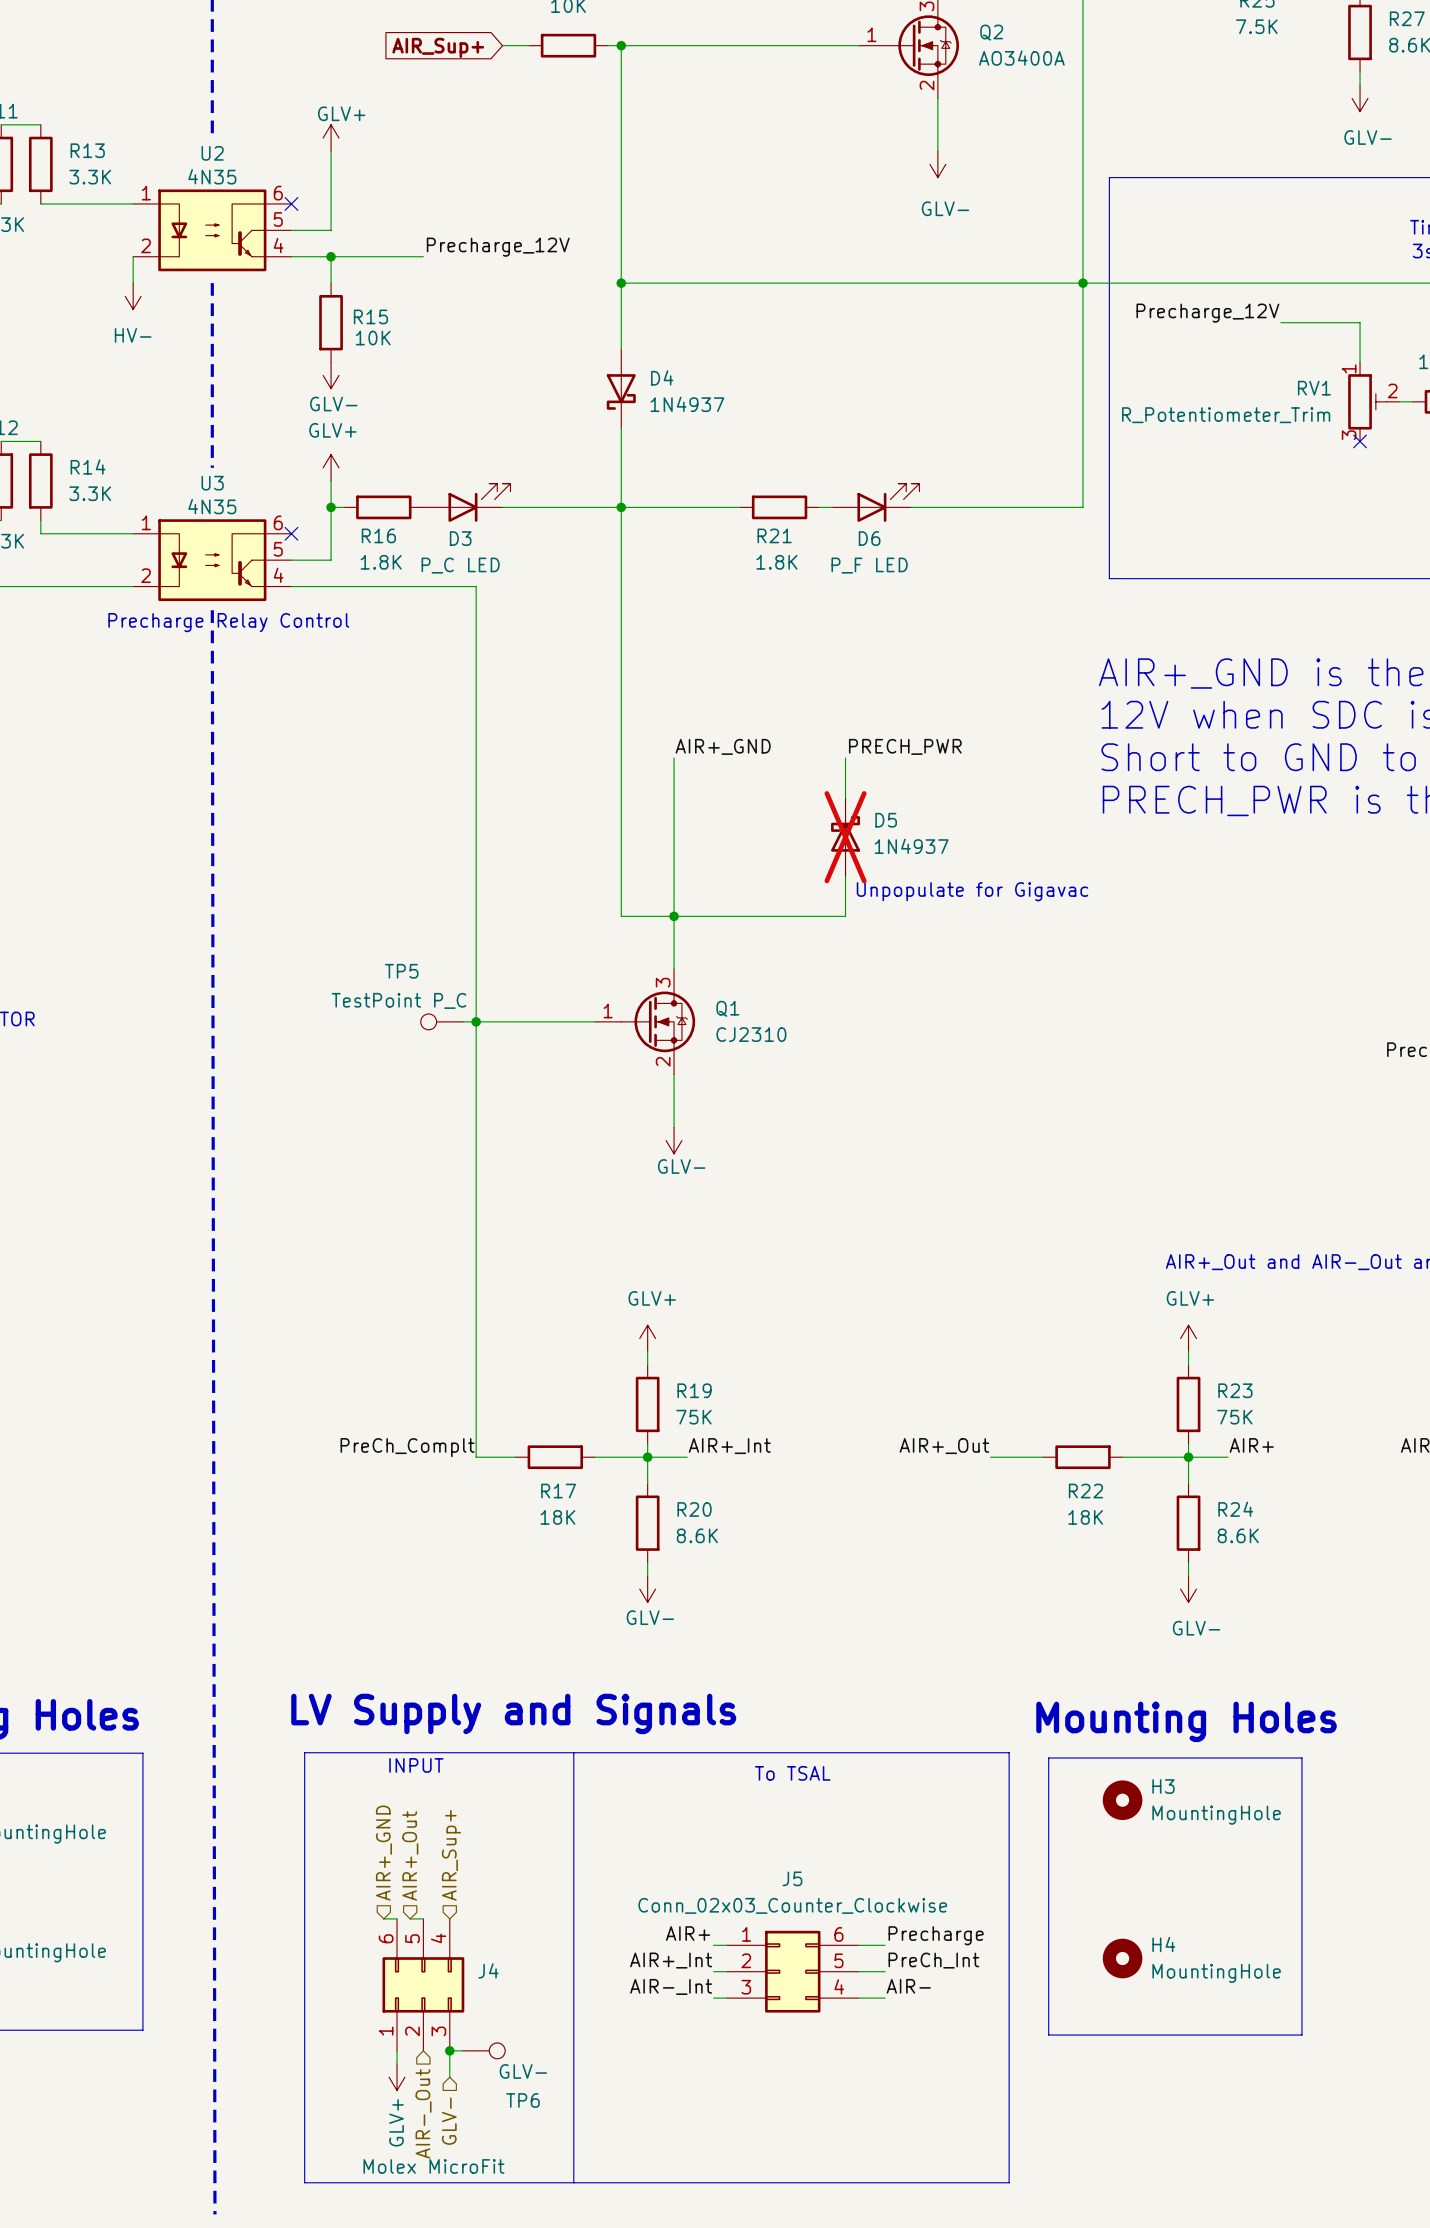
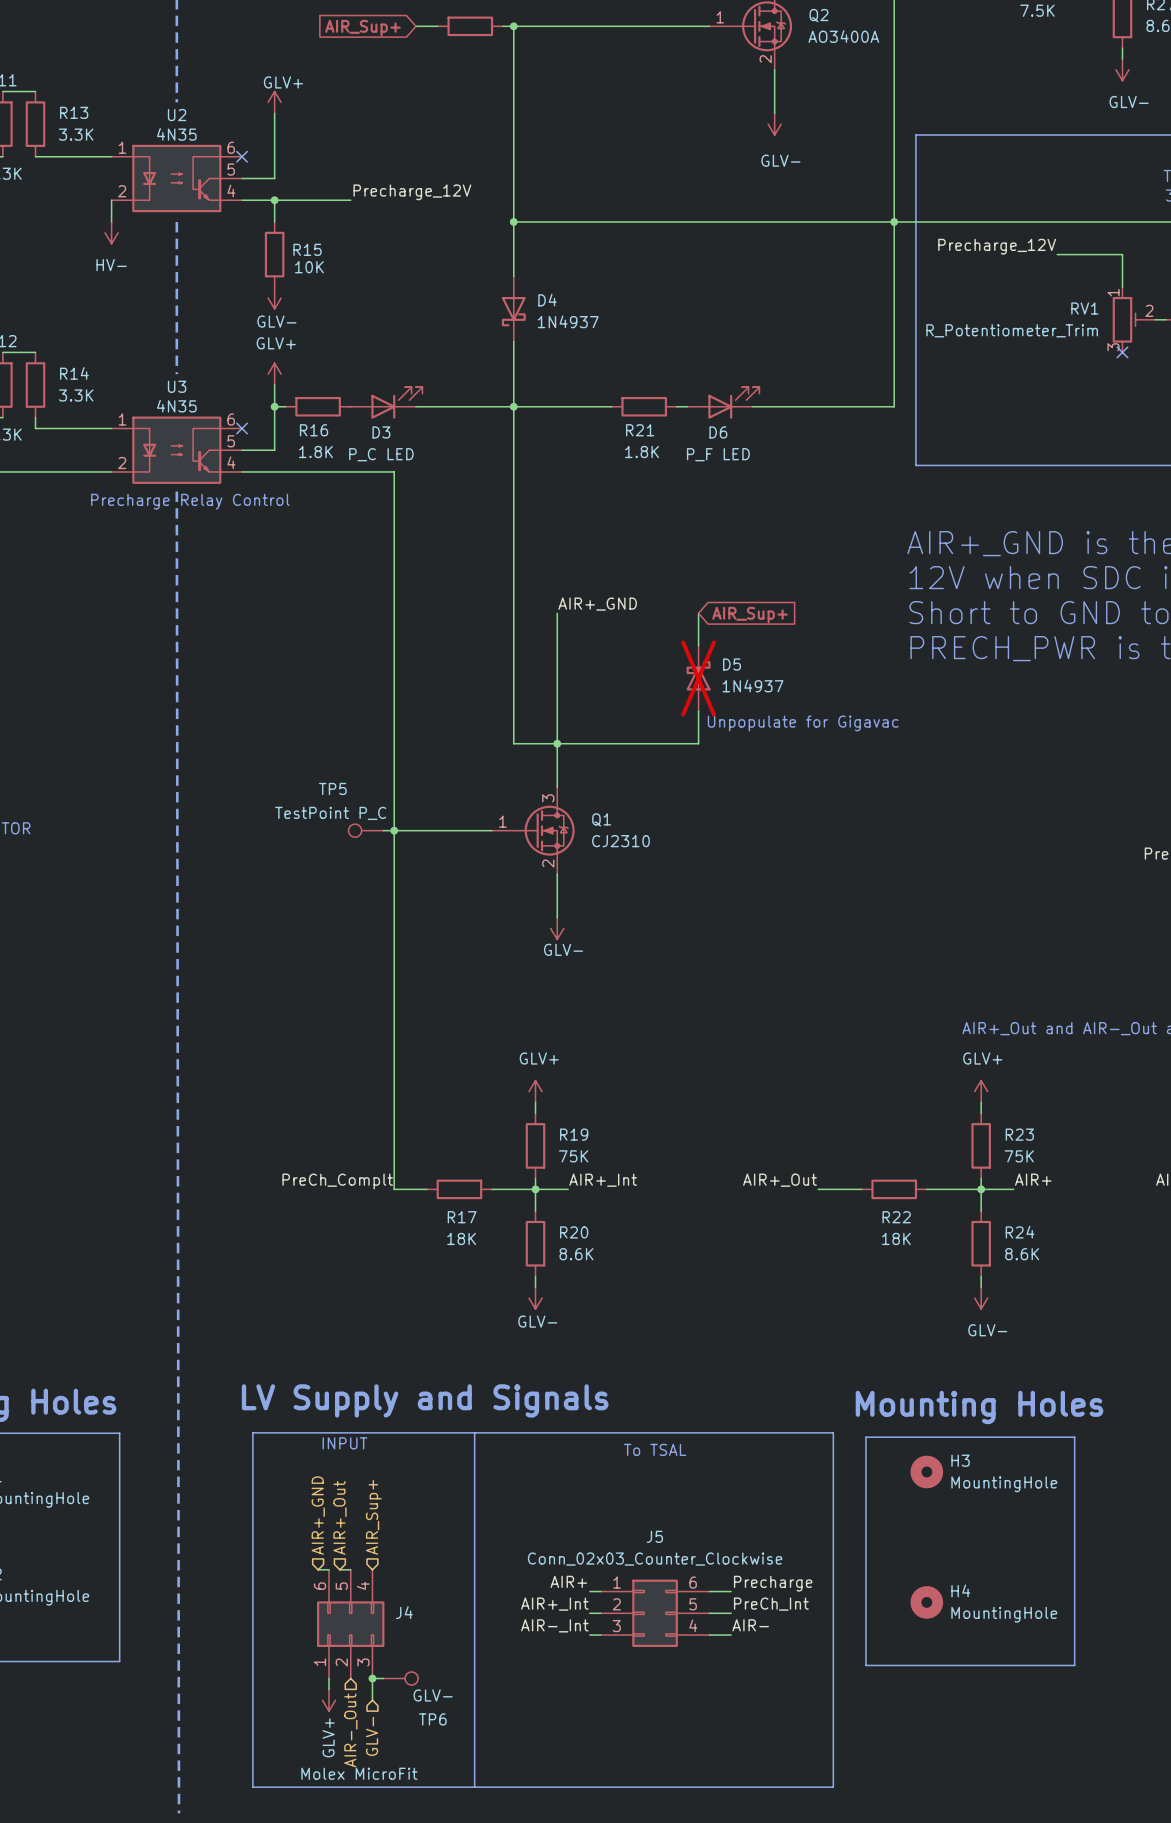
label: PRECH_PWR (905, 746) -> none
global label: none -> AIR_Sup+ (750, 615)

